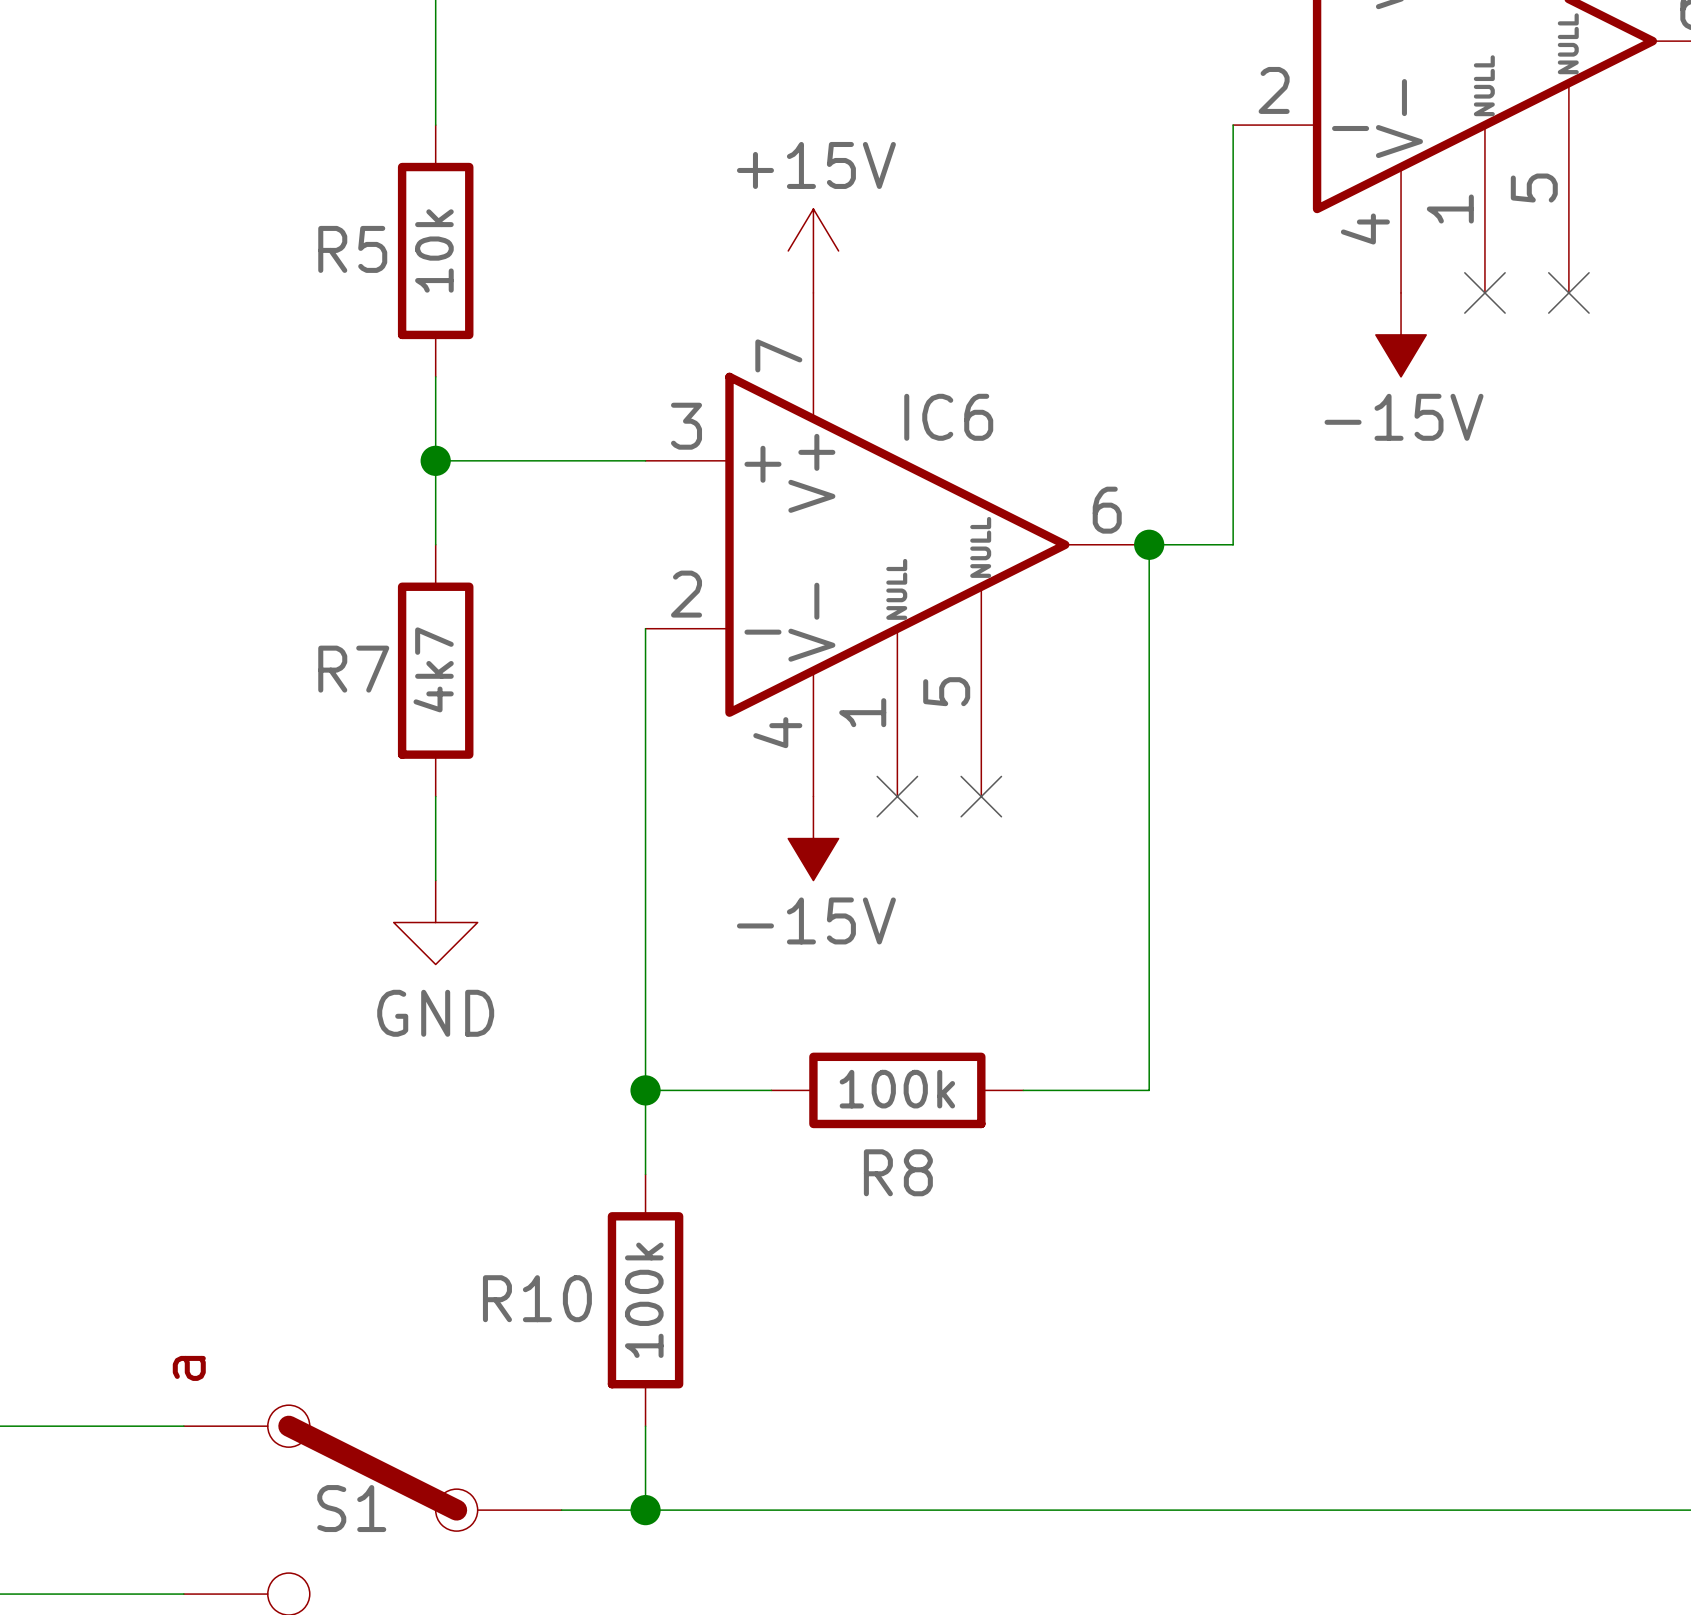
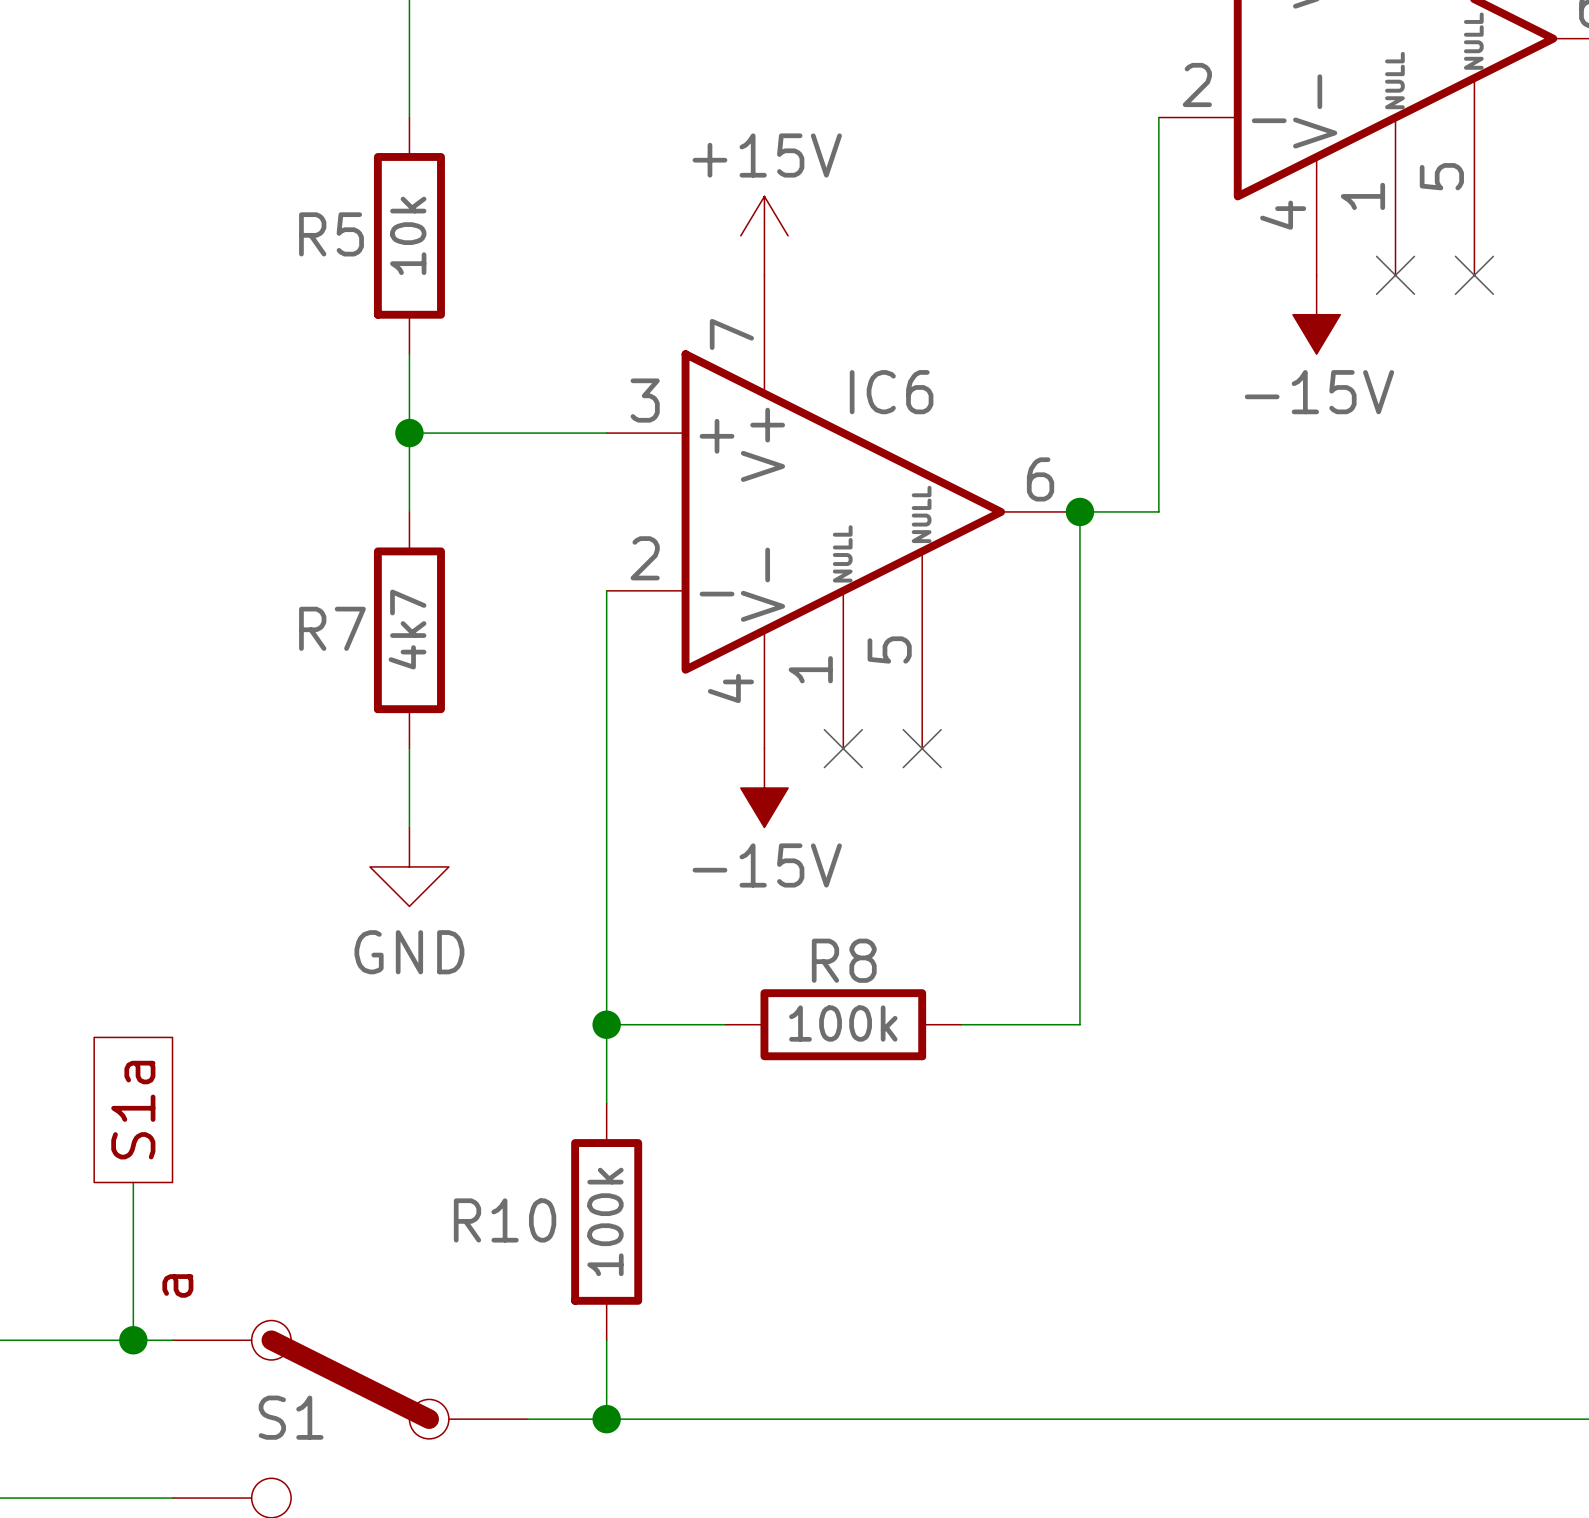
R8 name position: R8 (898, 1172) -> R8 (844, 960)
global label: none -> S1a (133, 1110)
wire: none -> (133, 1182) (133, 1340)
junction: none -> (133, 1340)
S1 name position: S1 (351, 1508) -> S1 (291, 1417)

